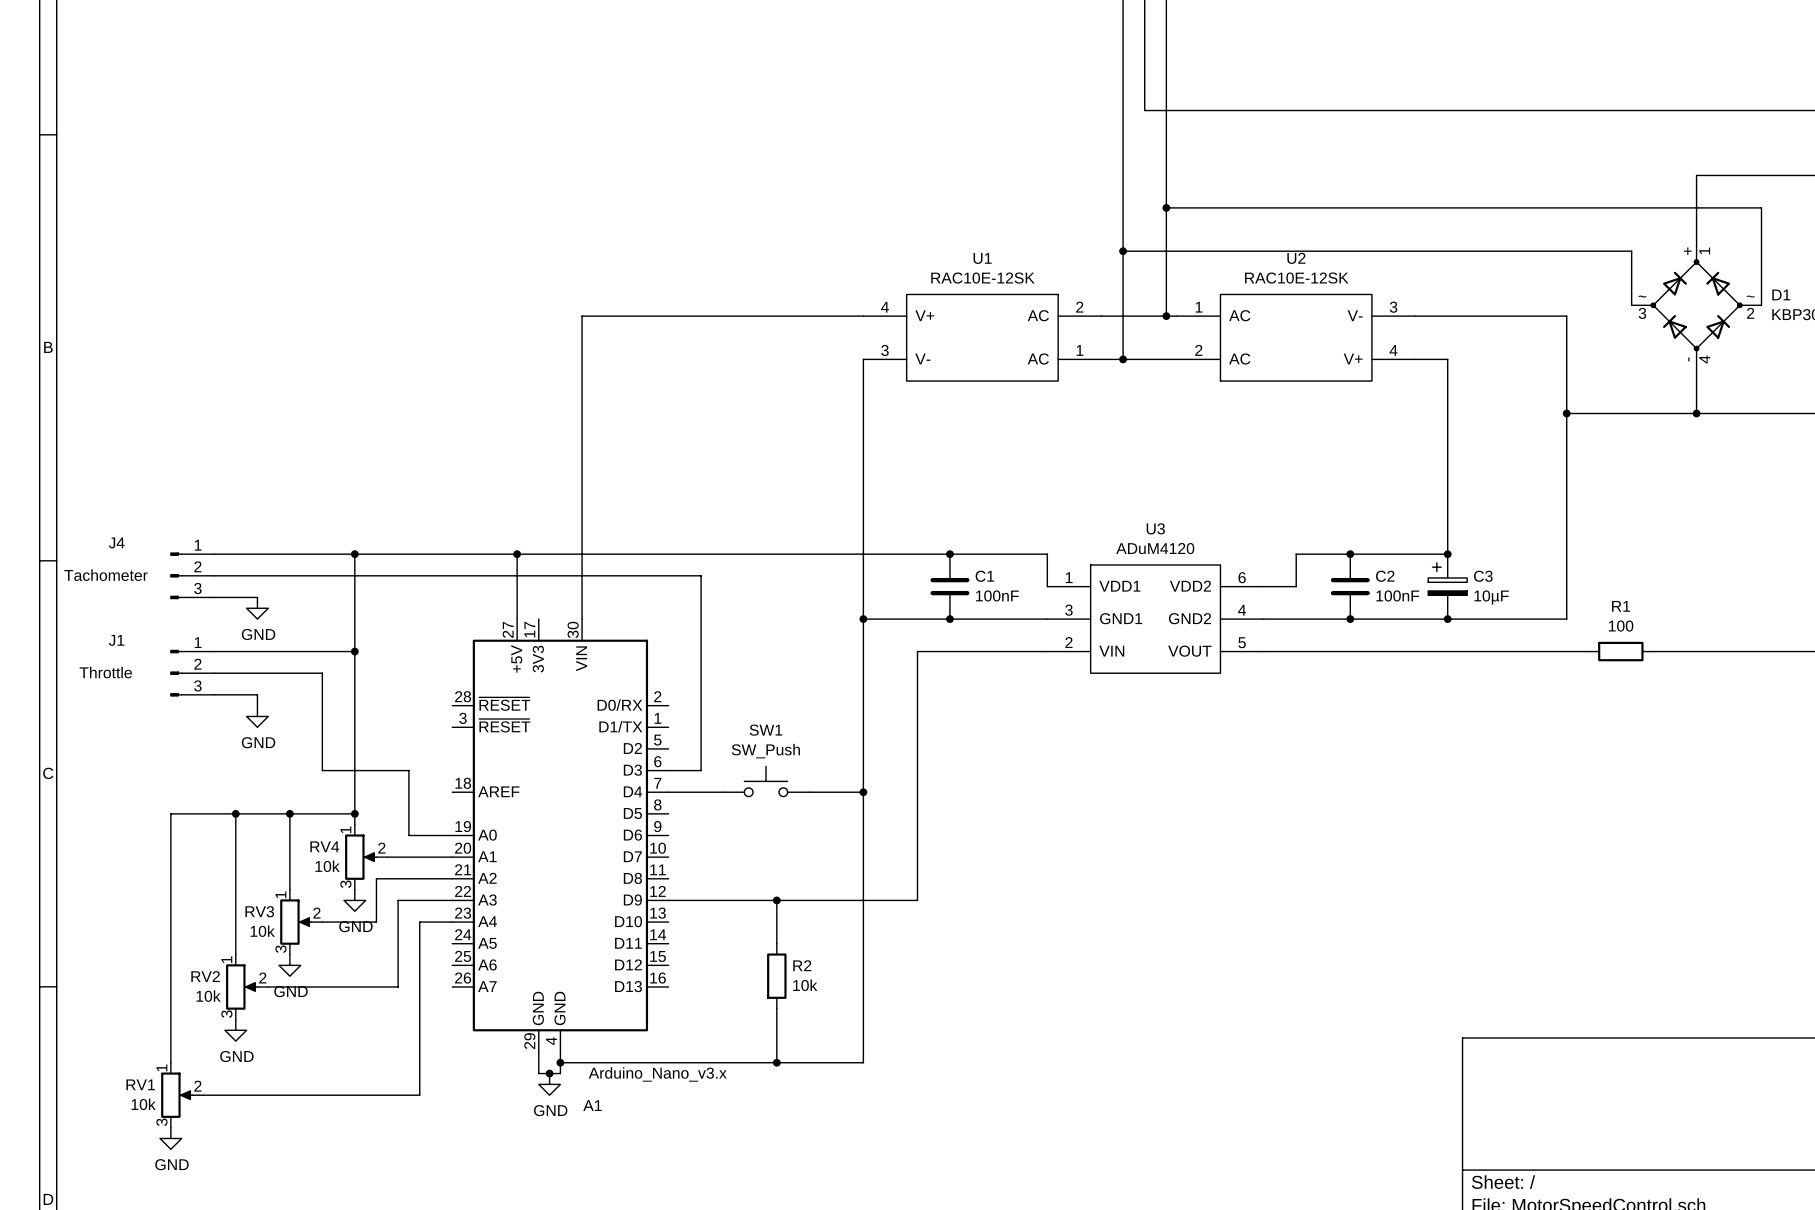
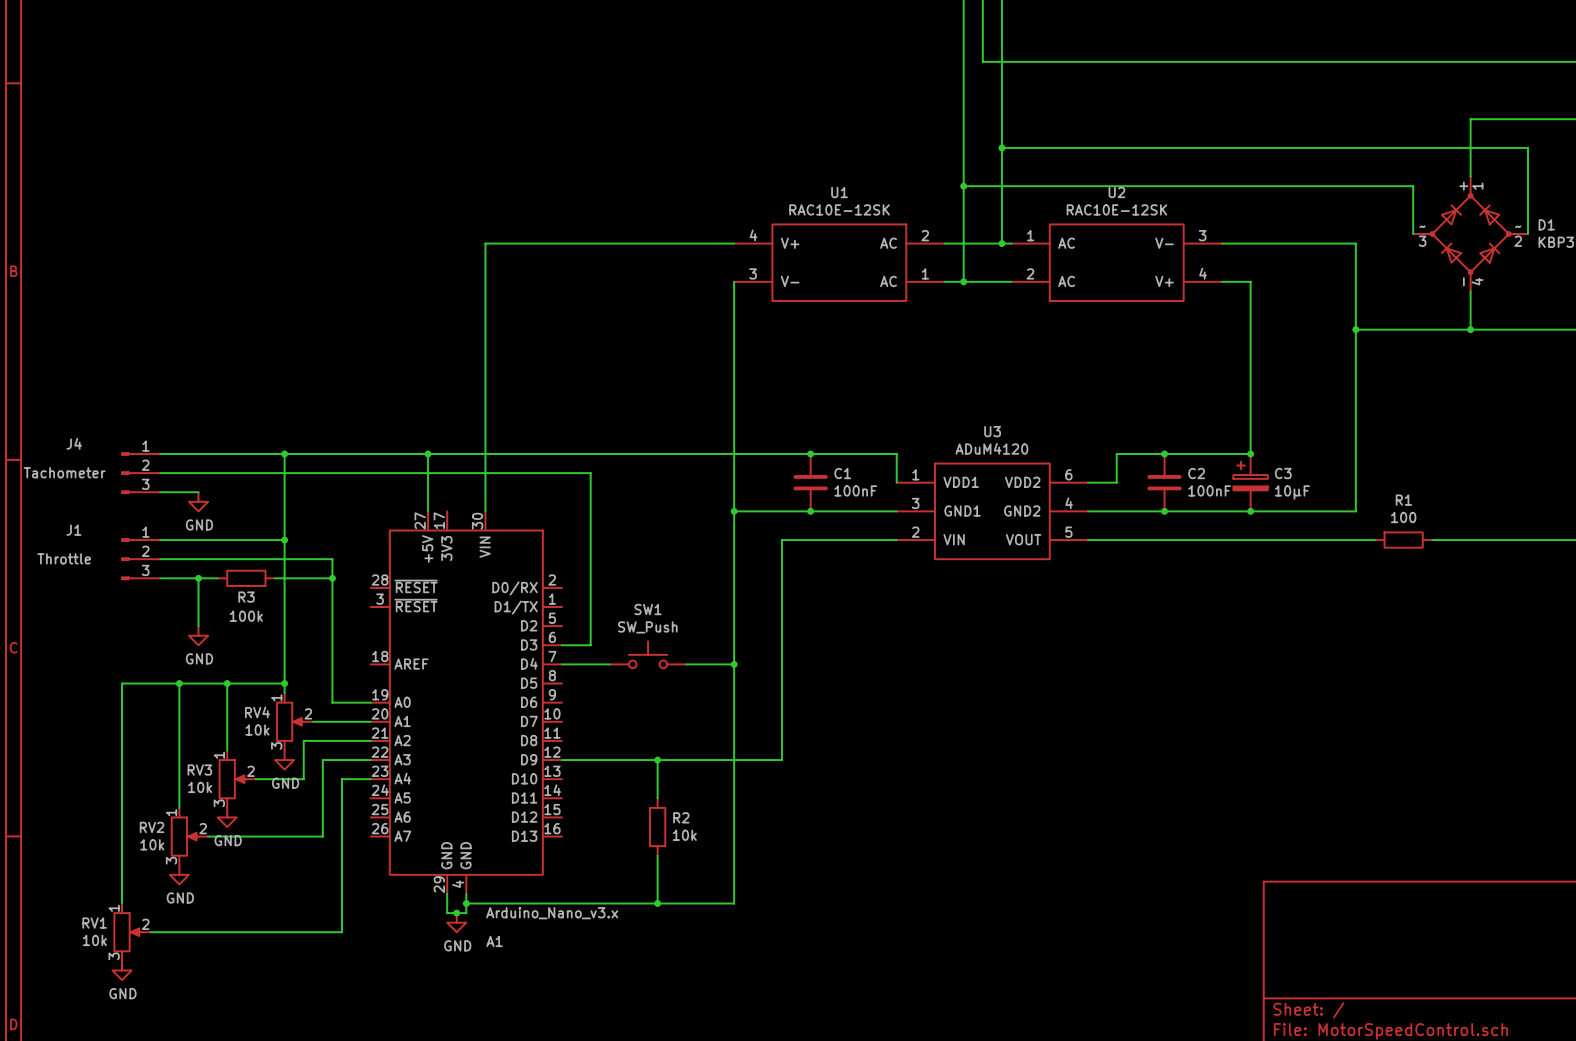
wire: (322, 673) (322, 770) (408, 770) -> (255, 559) (332, 559) (332, 645)
wire: none -> (198, 578) (217, 578)
junction: none -> (198, 578)
R3: none -> 100k (246, 578)
wire: none -> (275, 578) (332, 578)
junction: none -> (332, 578)
wire: none -> (198, 587) (198, 626)
power symbol position: GND (257, 716) -> GND (198, 635)

